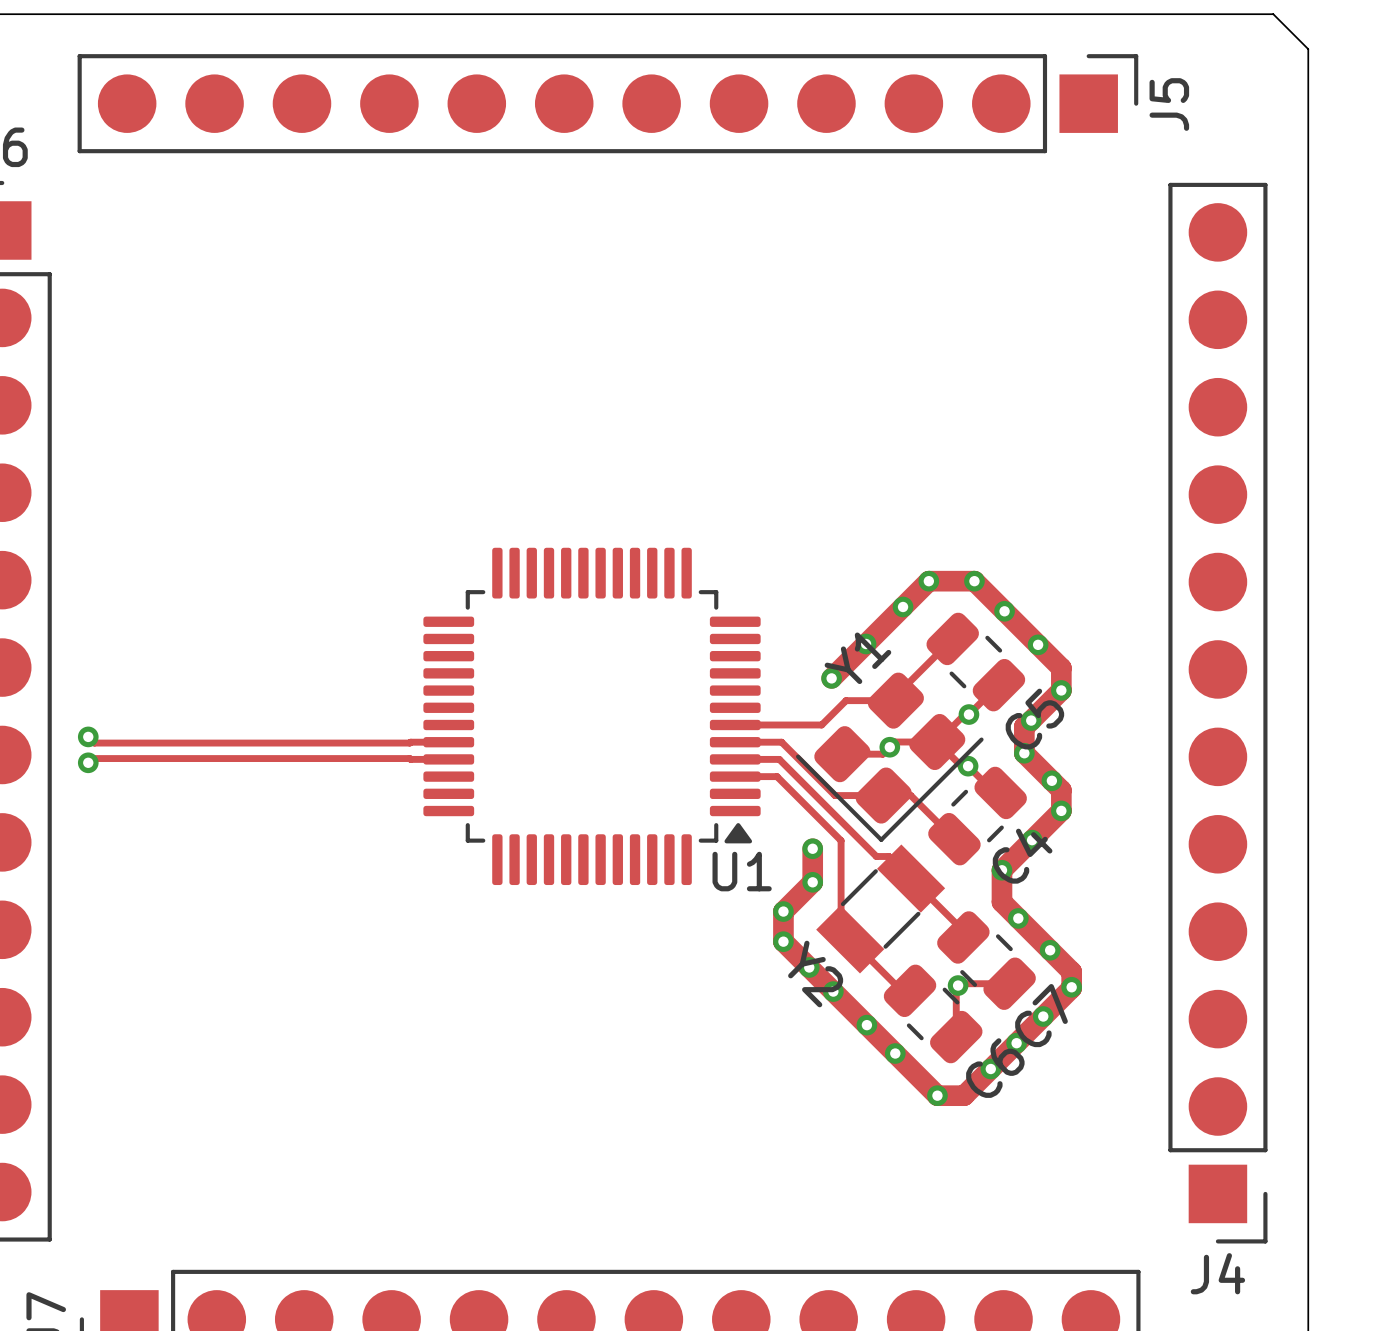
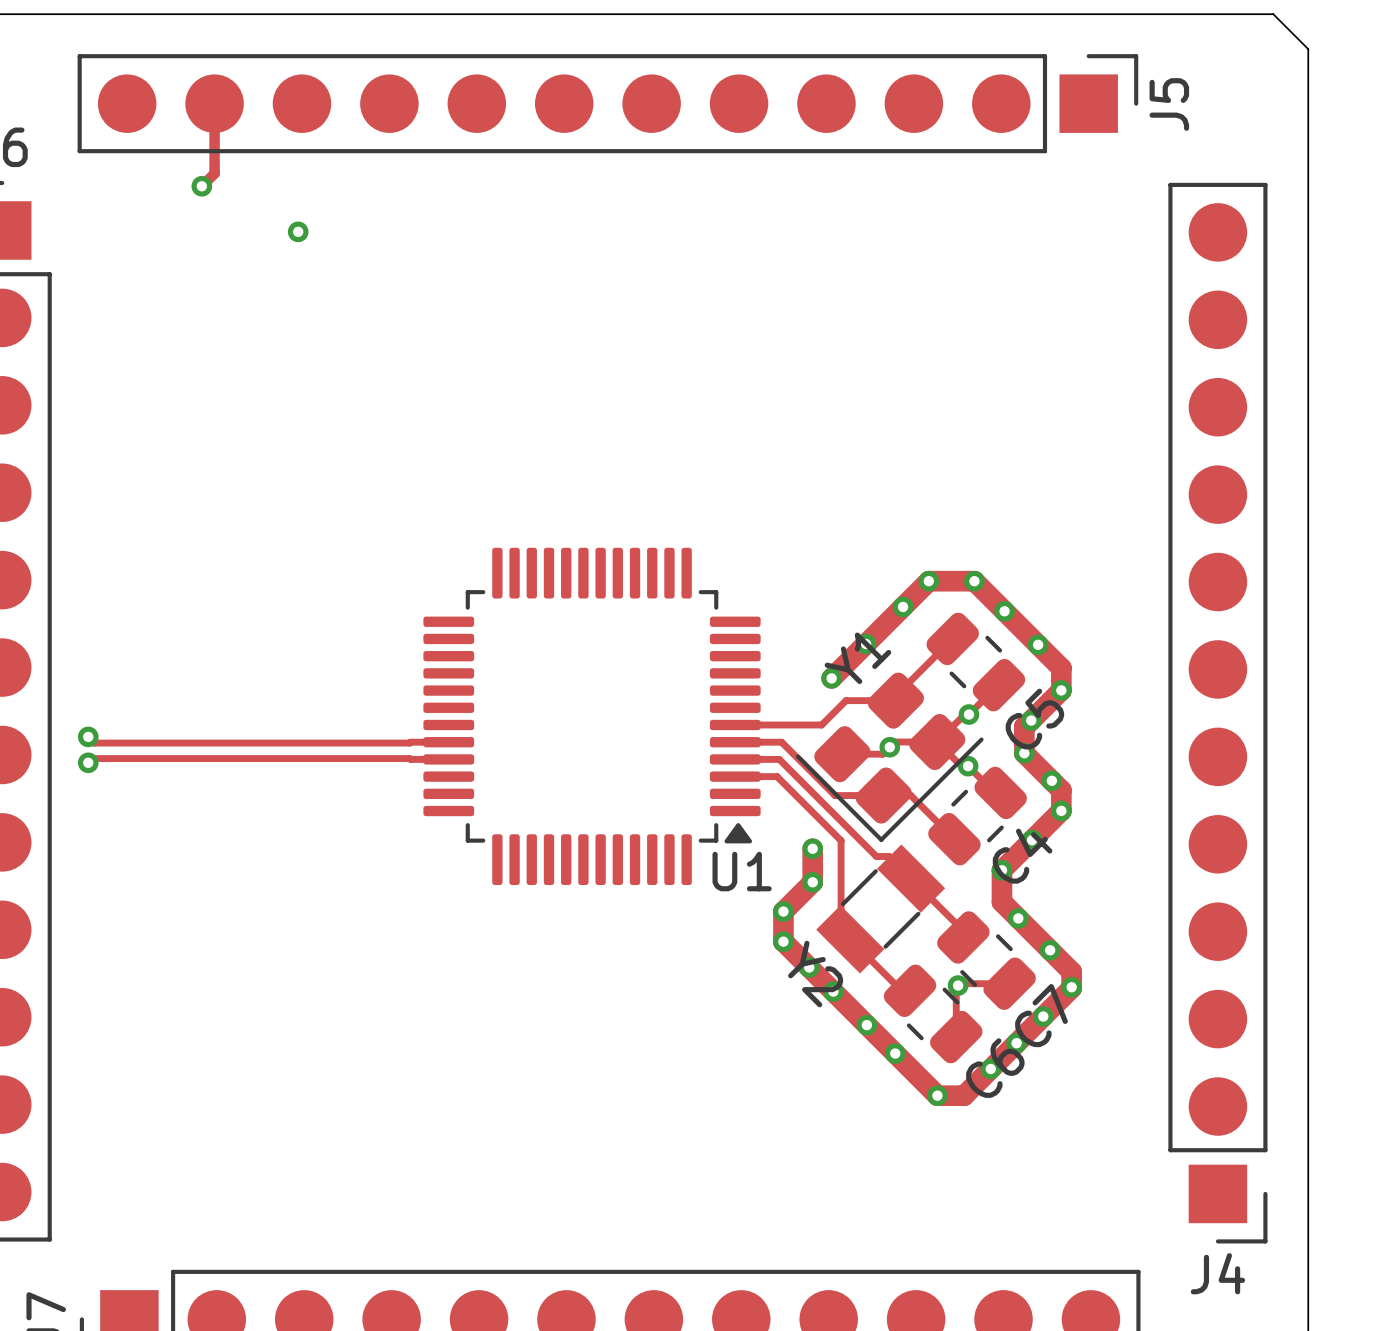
track: none -> (214, 103) (214, 173) (201, 186)
via: none -> (201, 186)
via: none -> (298, 231)

